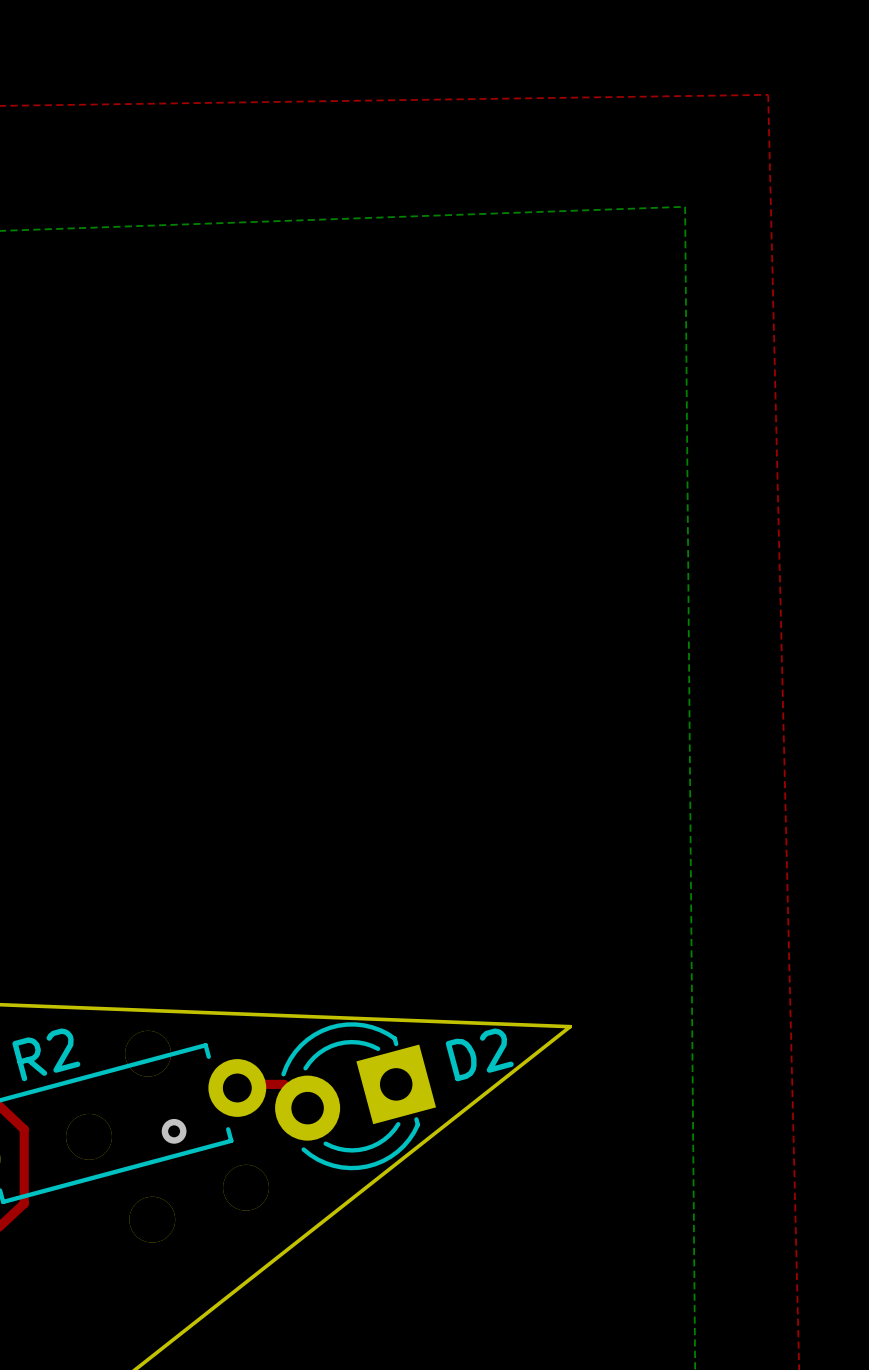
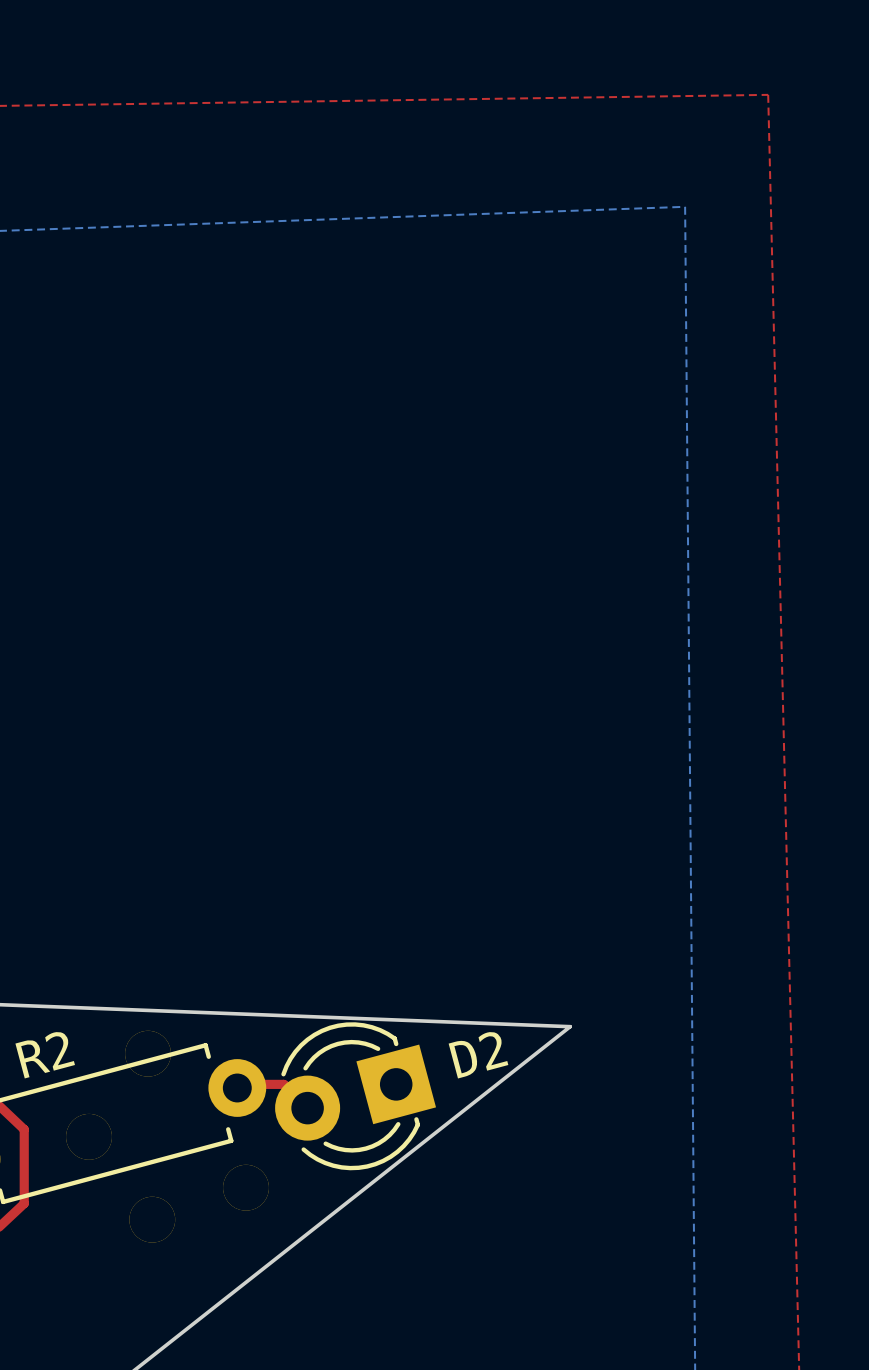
via: (174, 1131) -> none

